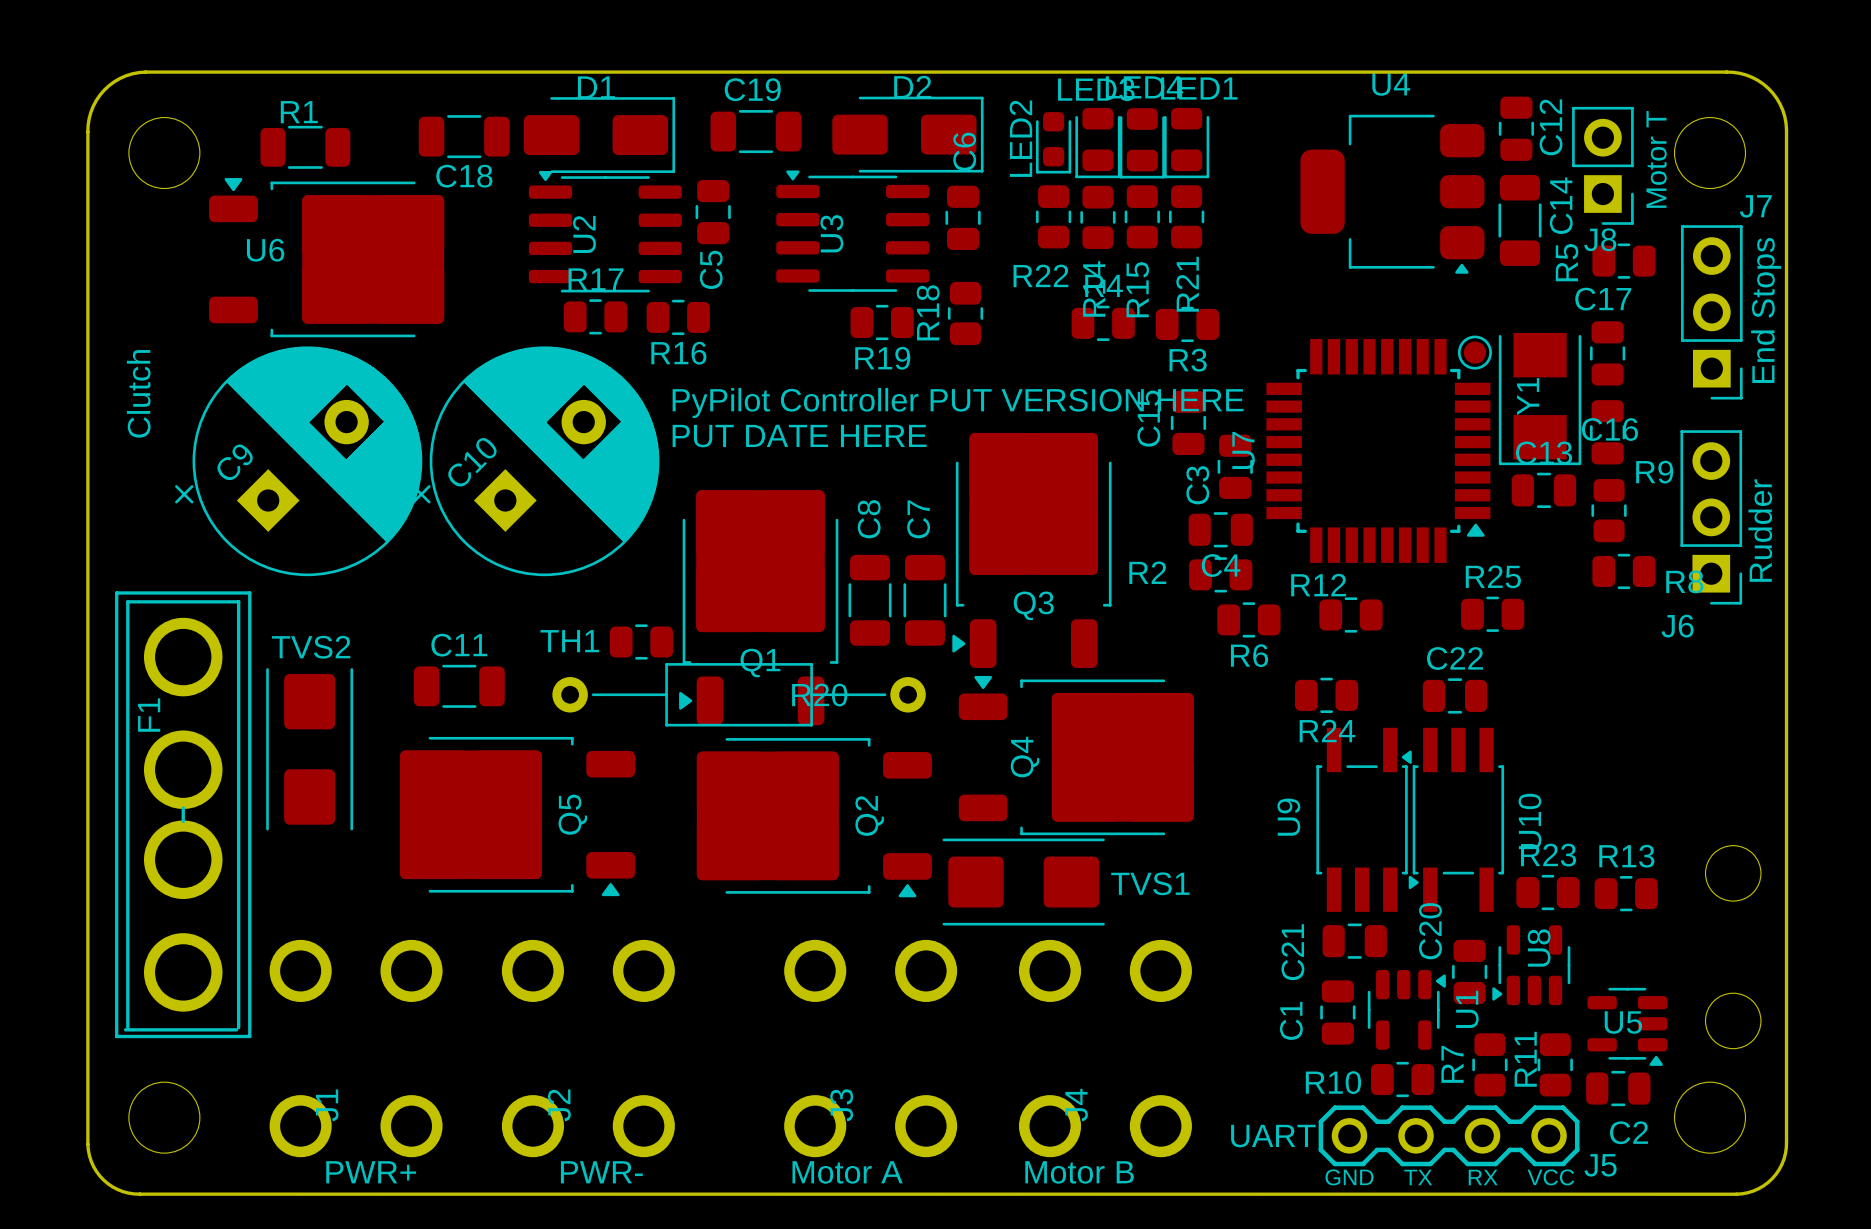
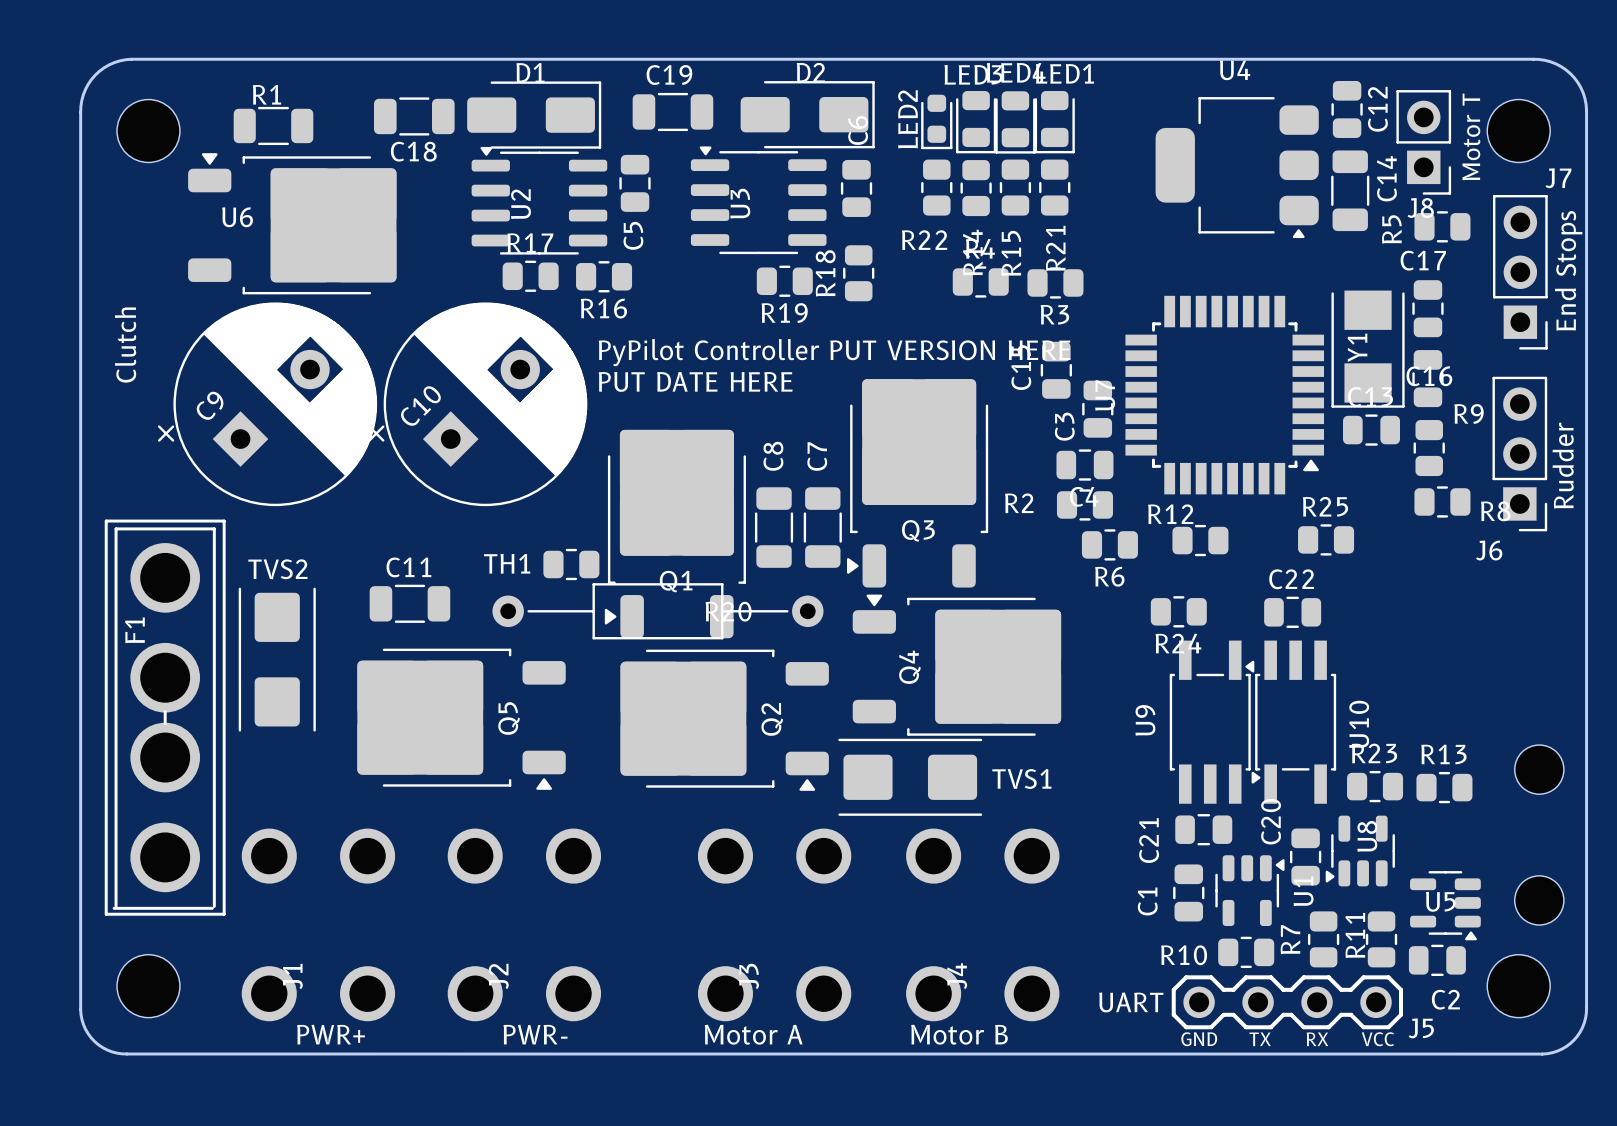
part: (1474, 352) -> none

